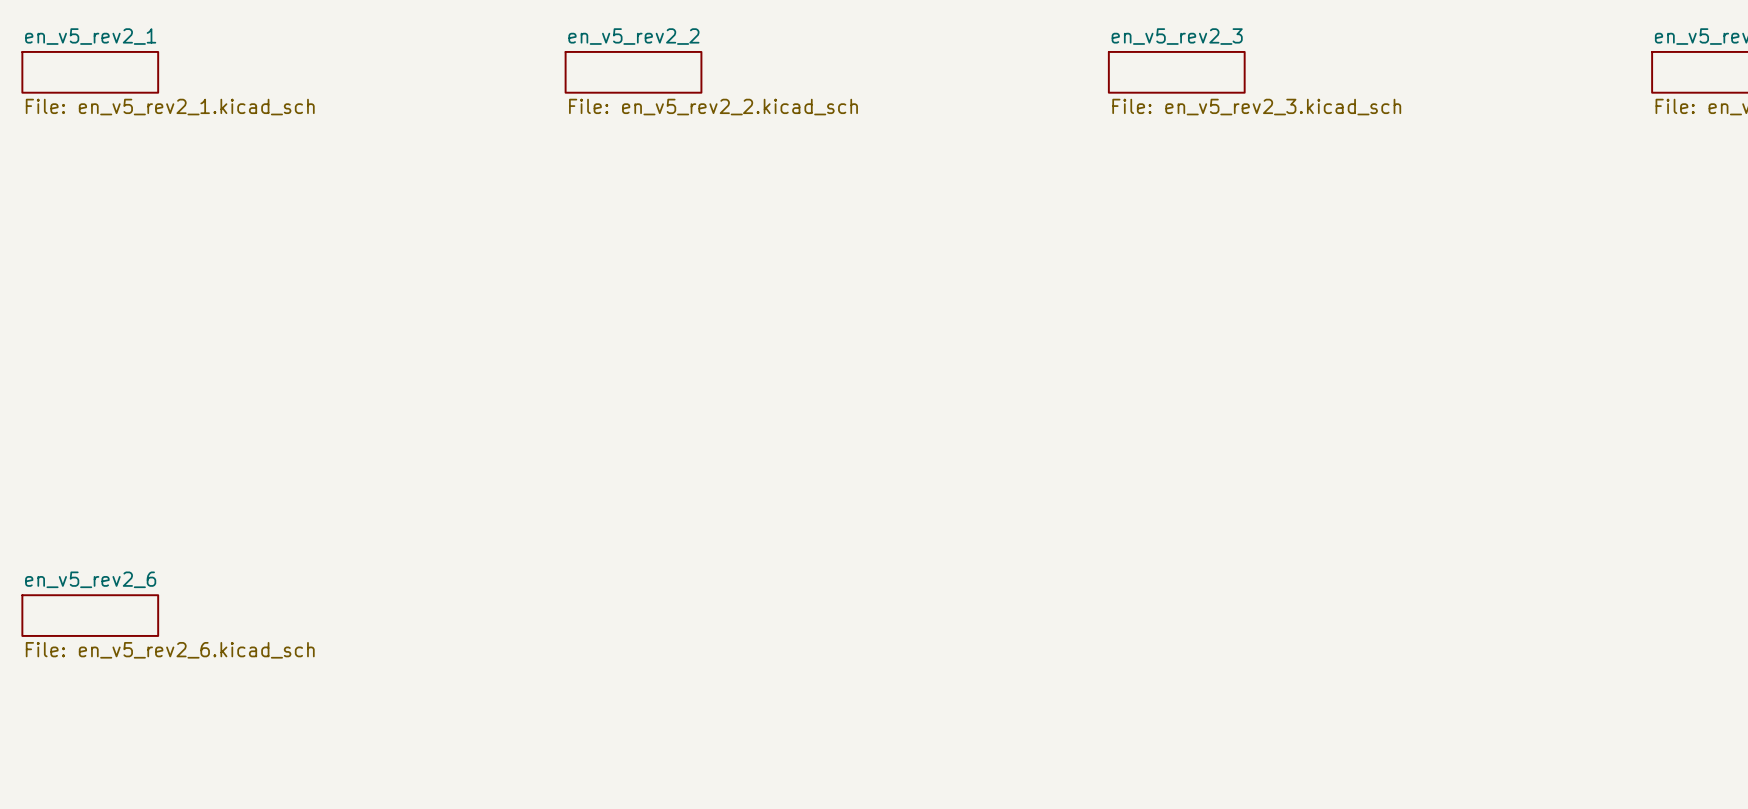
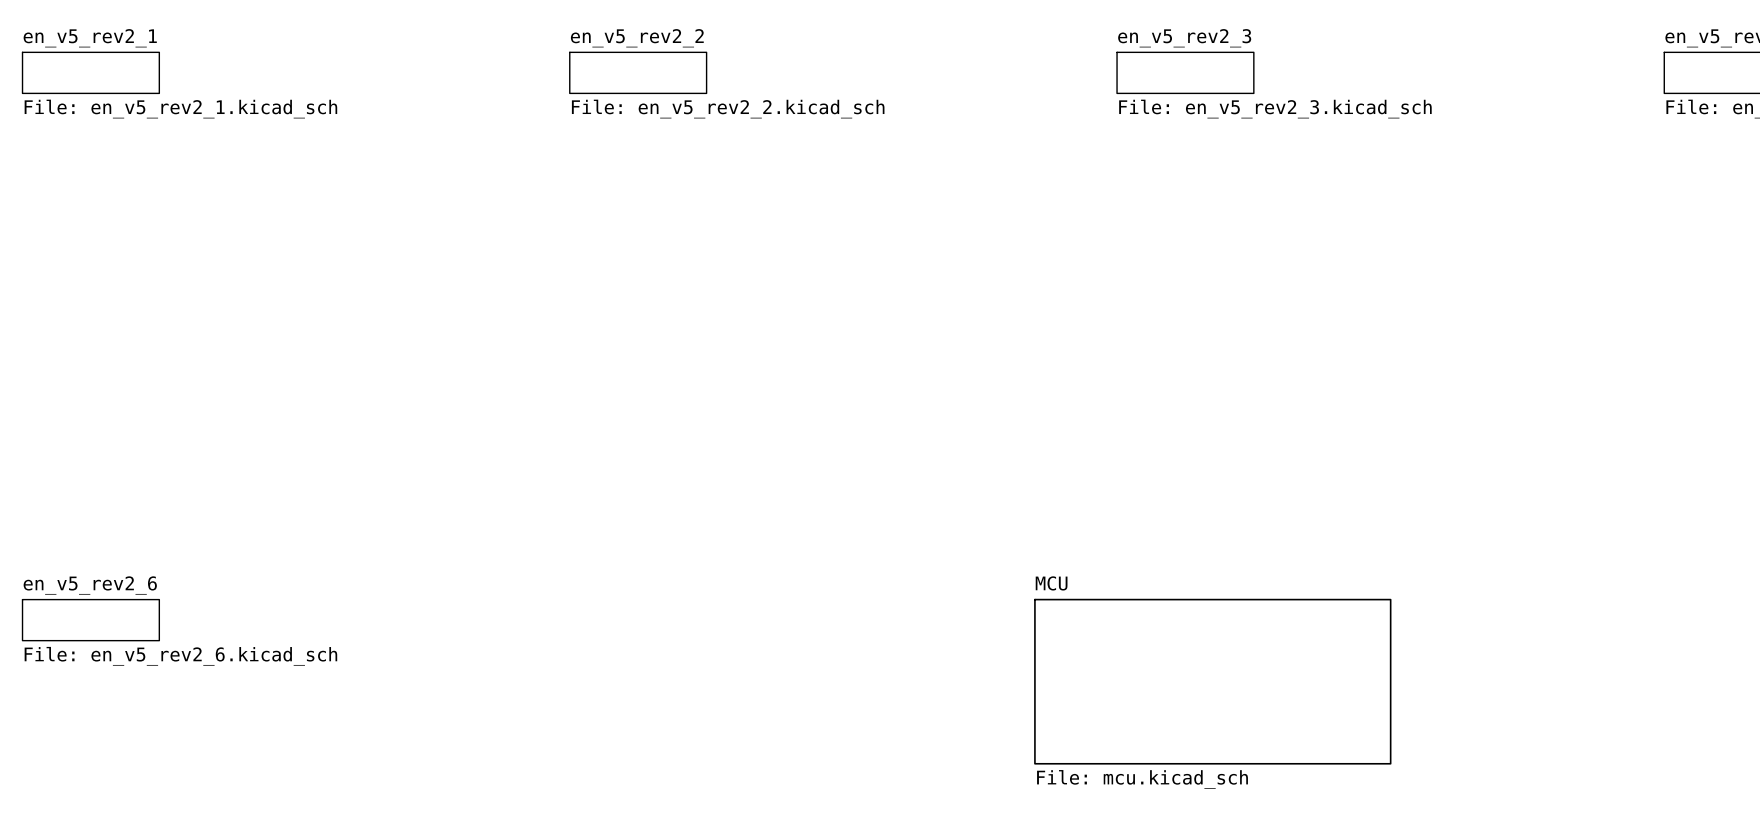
sheet MCU: none -> File: mcu.kicad_sch (1212, 681)

